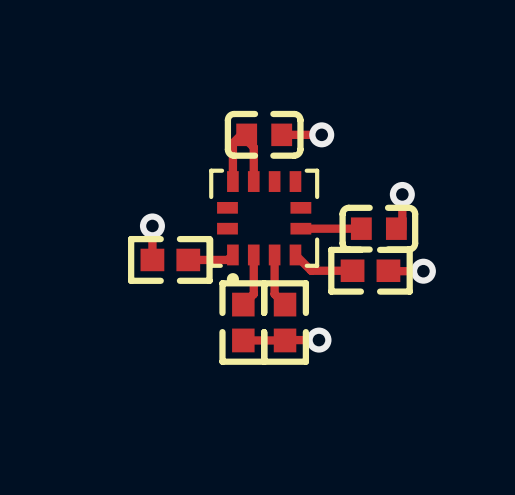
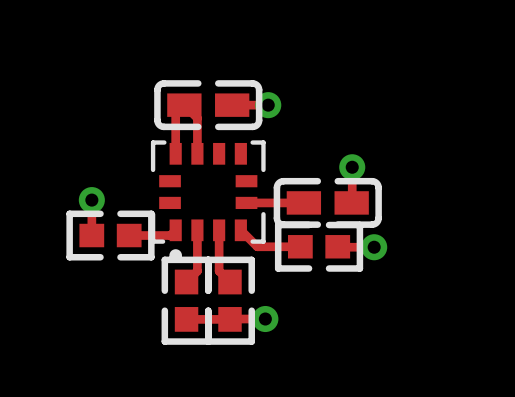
part footprint: [224, 110, 304, 159] -> [154, 80, 263, 131]
part footprint: [339, 204, 419, 253] -> [273, 177, 382, 228]

